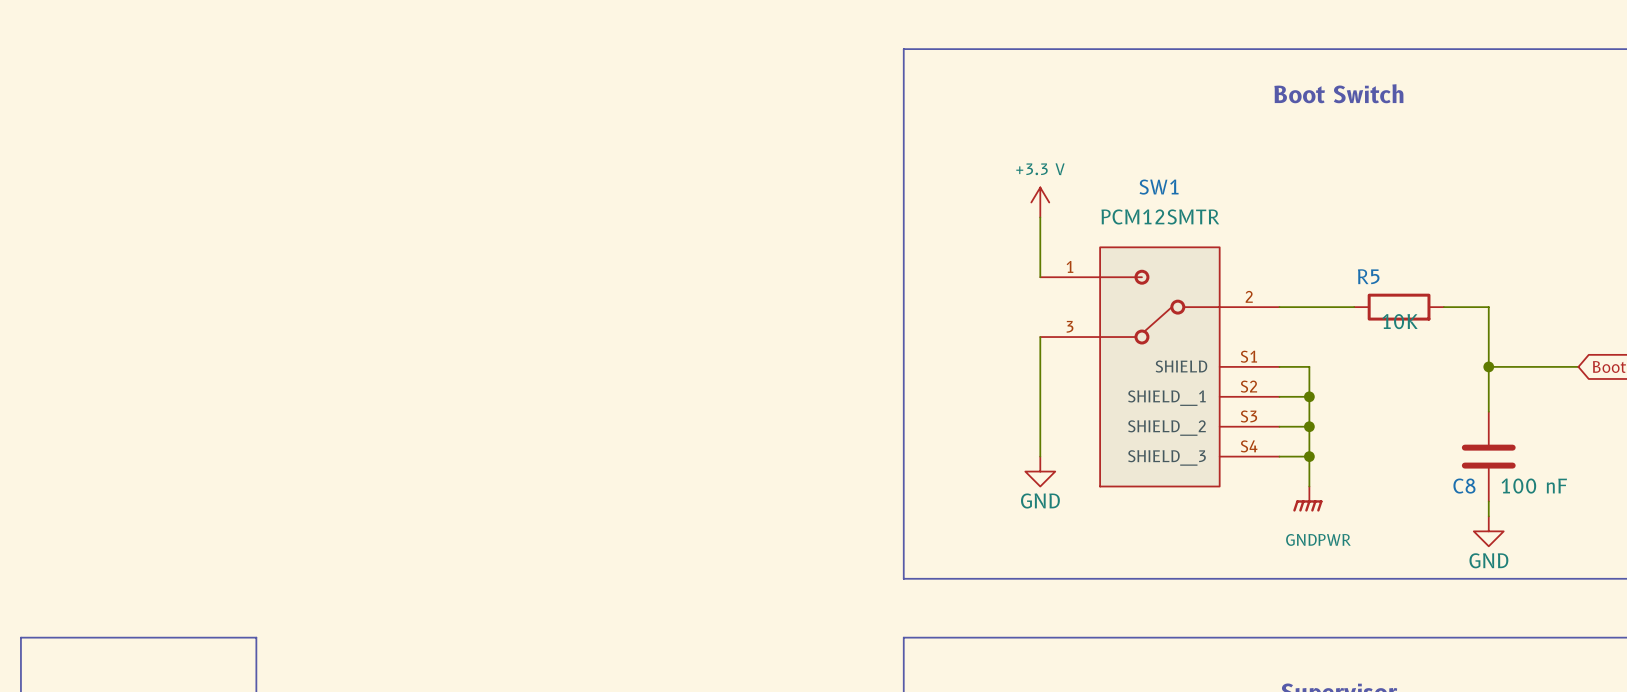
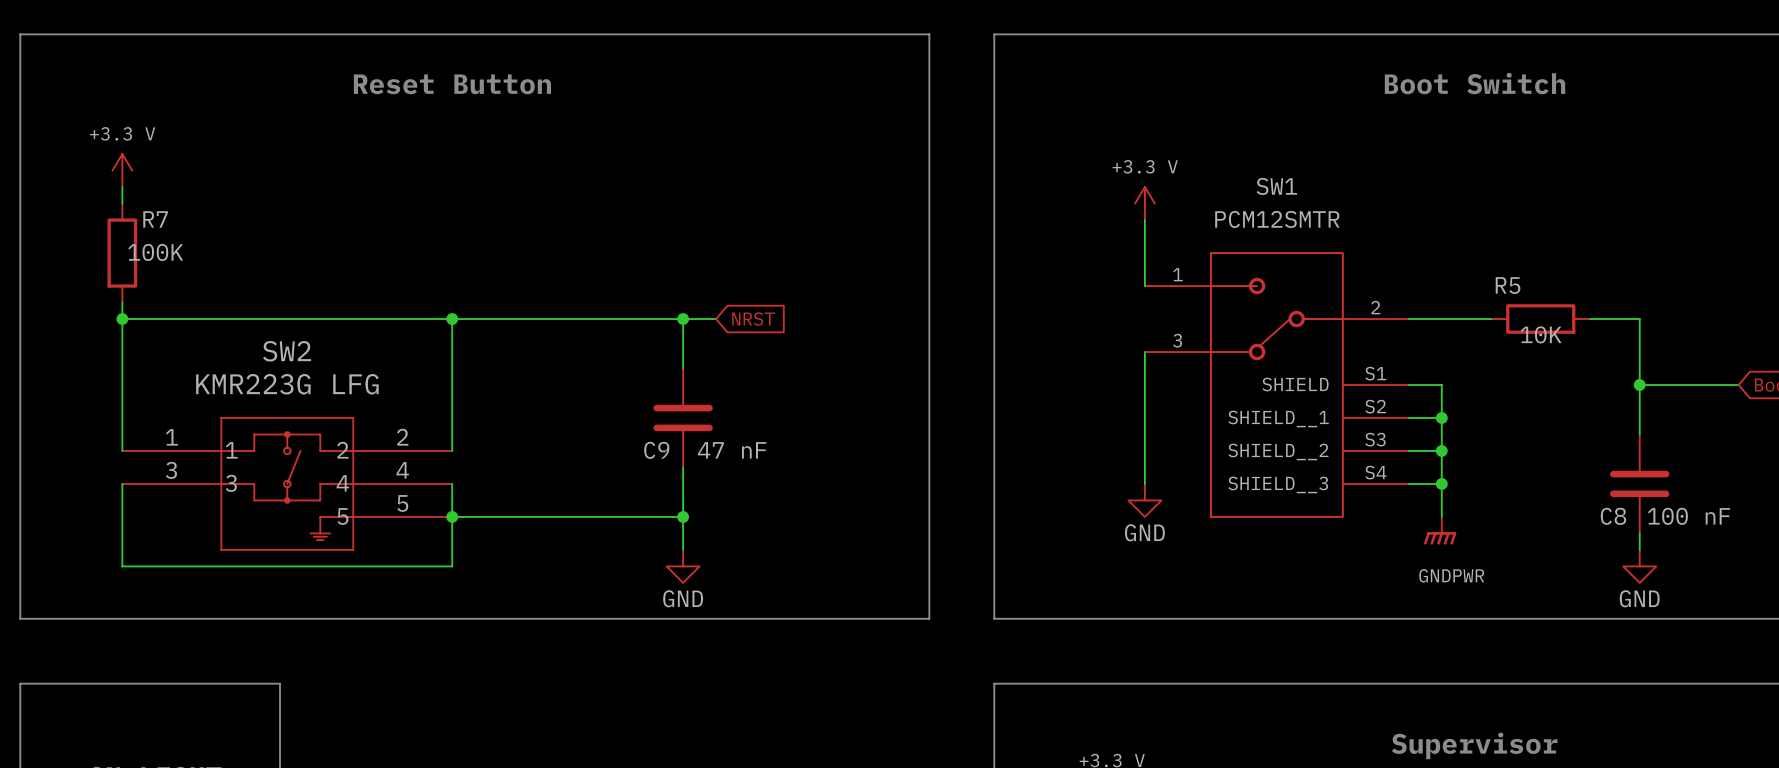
line: none -> (20, 34) (929, 34) (929, 618) (20, 618) (20, 34)
text: none -> Reset Button (452, 84)
power symbol: none -> +3.3 V (122, 170)
wire: none -> (122, 187) (122, 203)
R7: none -> 100K (122, 253)
wire: none -> (122, 302) (122, 450)
wire: none -> (122, 319) (716, 319)
junction: none -> (122, 319)
wire: none -> (452, 319) (452, 450)
junction: none -> (452, 319)
wire: none -> (683, 319) (683, 368)
junction: none -> (683, 319)
global label: none -> NRST (753, 319)
C9: none -> 47 nF (683, 417)
wire: none -> (683, 467) (683, 549)
wire: none -> (122, 483) (122, 566) (452, 566) (452, 483)
SW2: none -> KMR223G LFG (287, 483)
wire: none -> (452, 516) (683, 516)
junction: none -> (452, 516)
junction: none -> (683, 516)
power symbol: none -> GND (683, 566)

